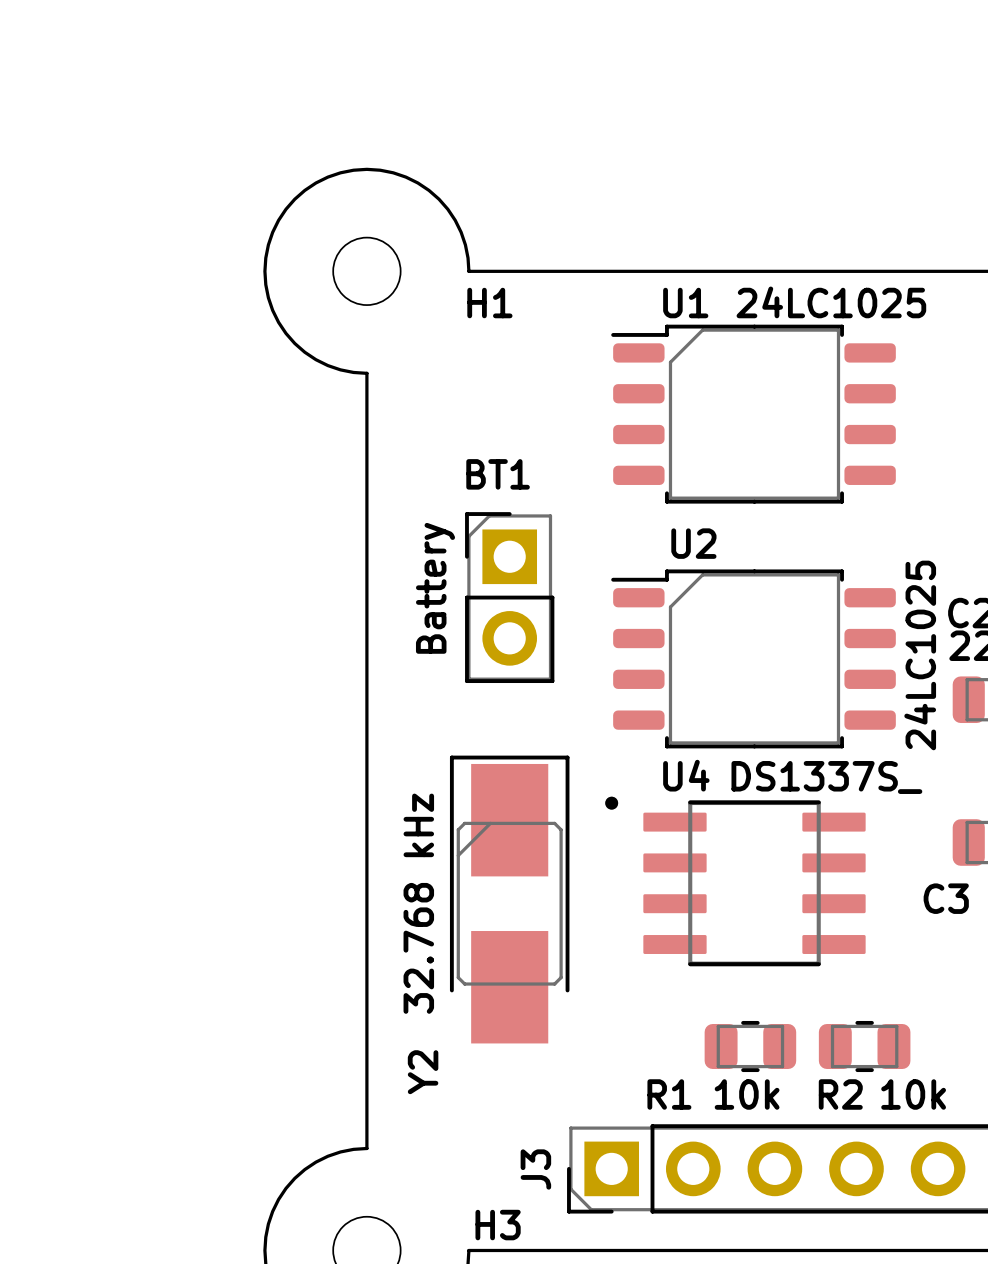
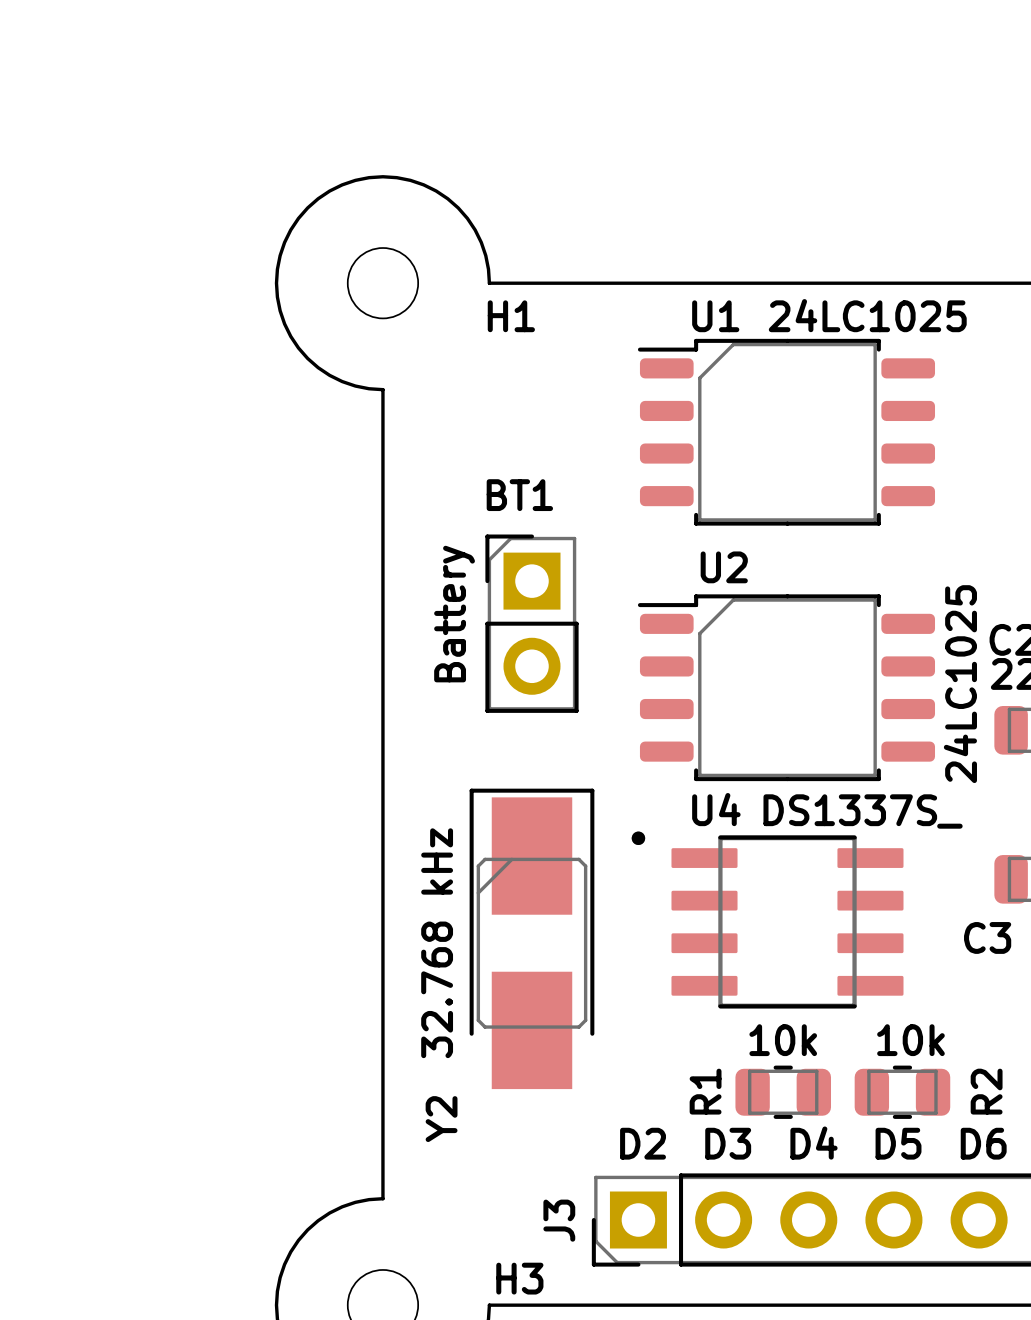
R1 name rotation: 0° (669, 1094) -> 90° counterclockwise (705, 1091)
R1 value position: 10k (747, 1094) -> 10k (783, 1040)
R2 name rotation: 0° (840, 1094) -> 90° counterclockwise (986, 1091)
R2 name position: R2 (840, 1094) -> R2 (986, 1091)
R2 value position: 10k (913, 1094) -> 10k (910, 1040)
text: none -> D2 (643, 1143)
text: none -> D3 (728, 1143)
text: none -> D4 (813, 1143)
text: none -> D5 (898, 1143)
text: none -> D6 (983, 1143)

